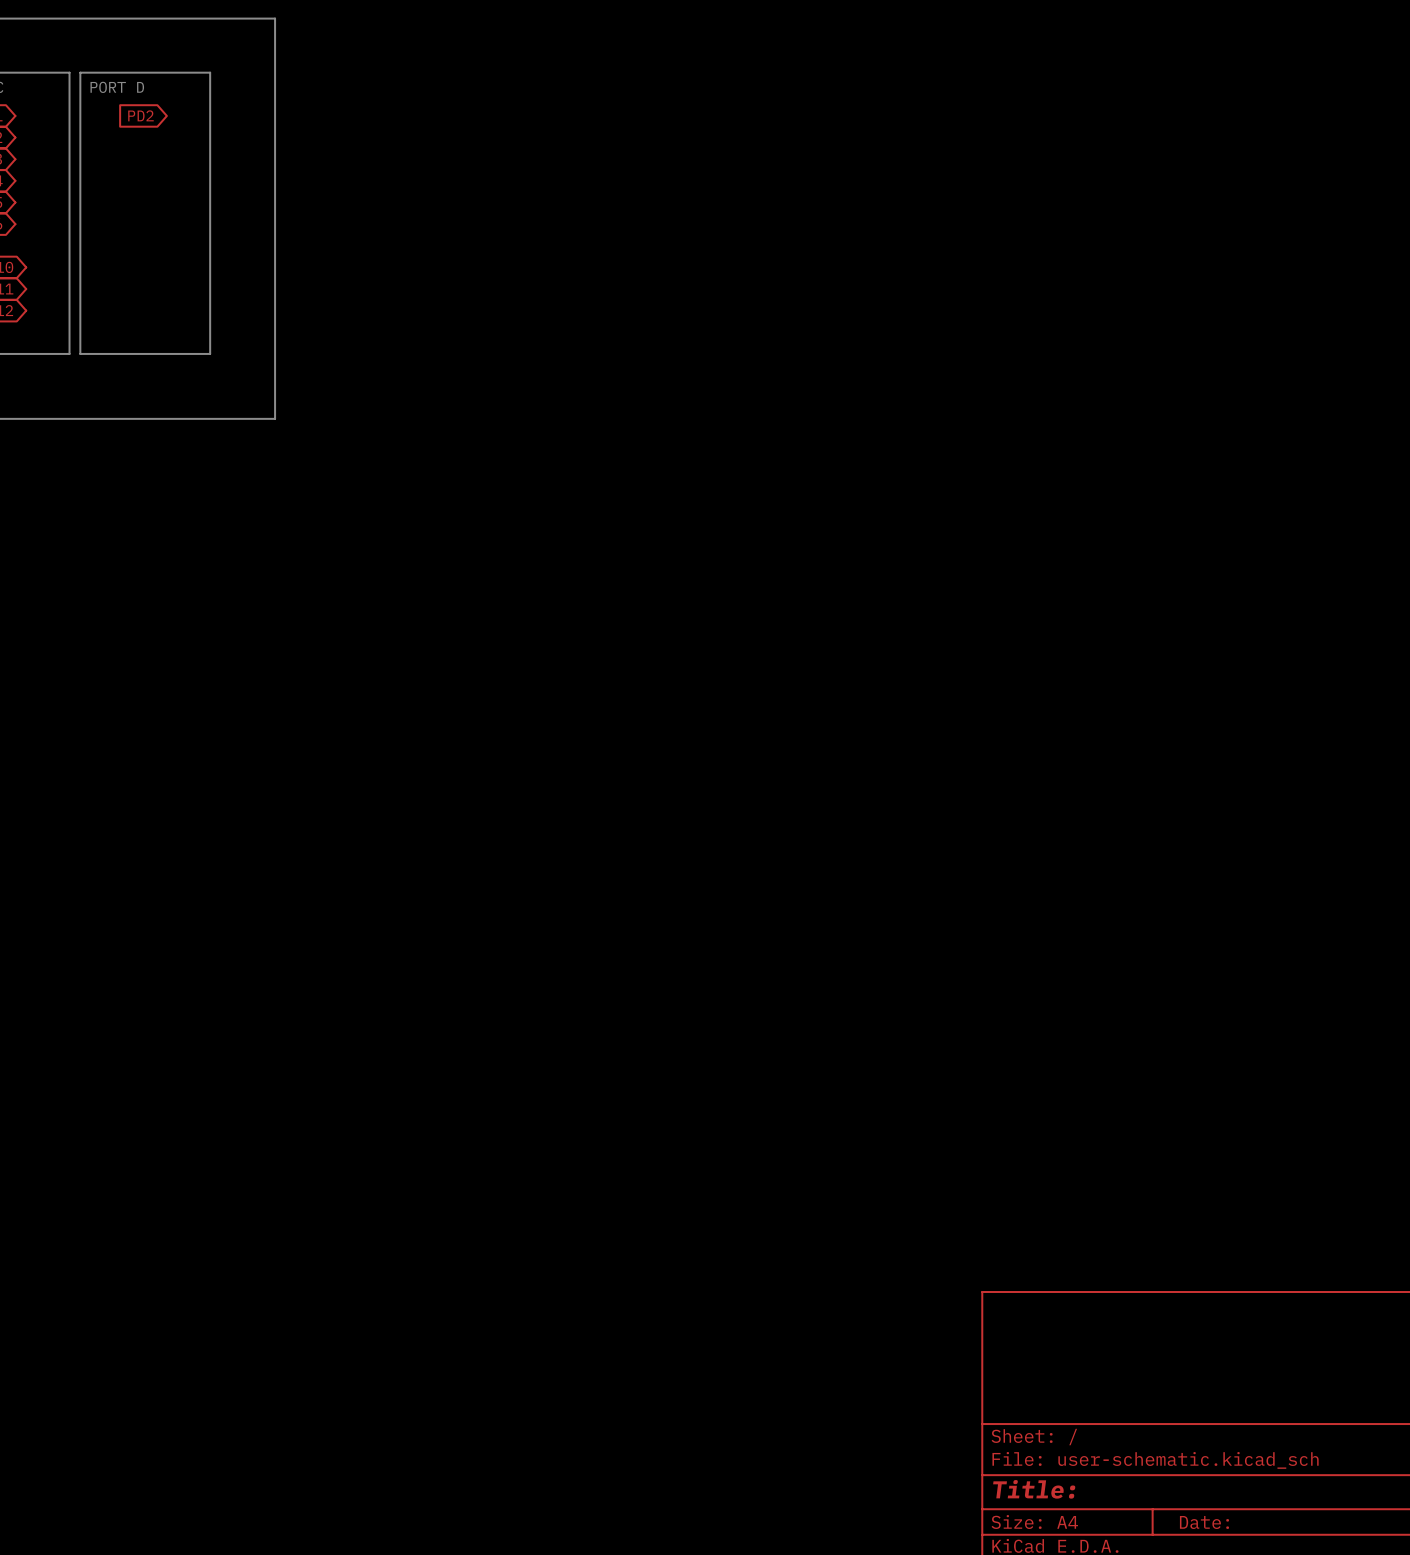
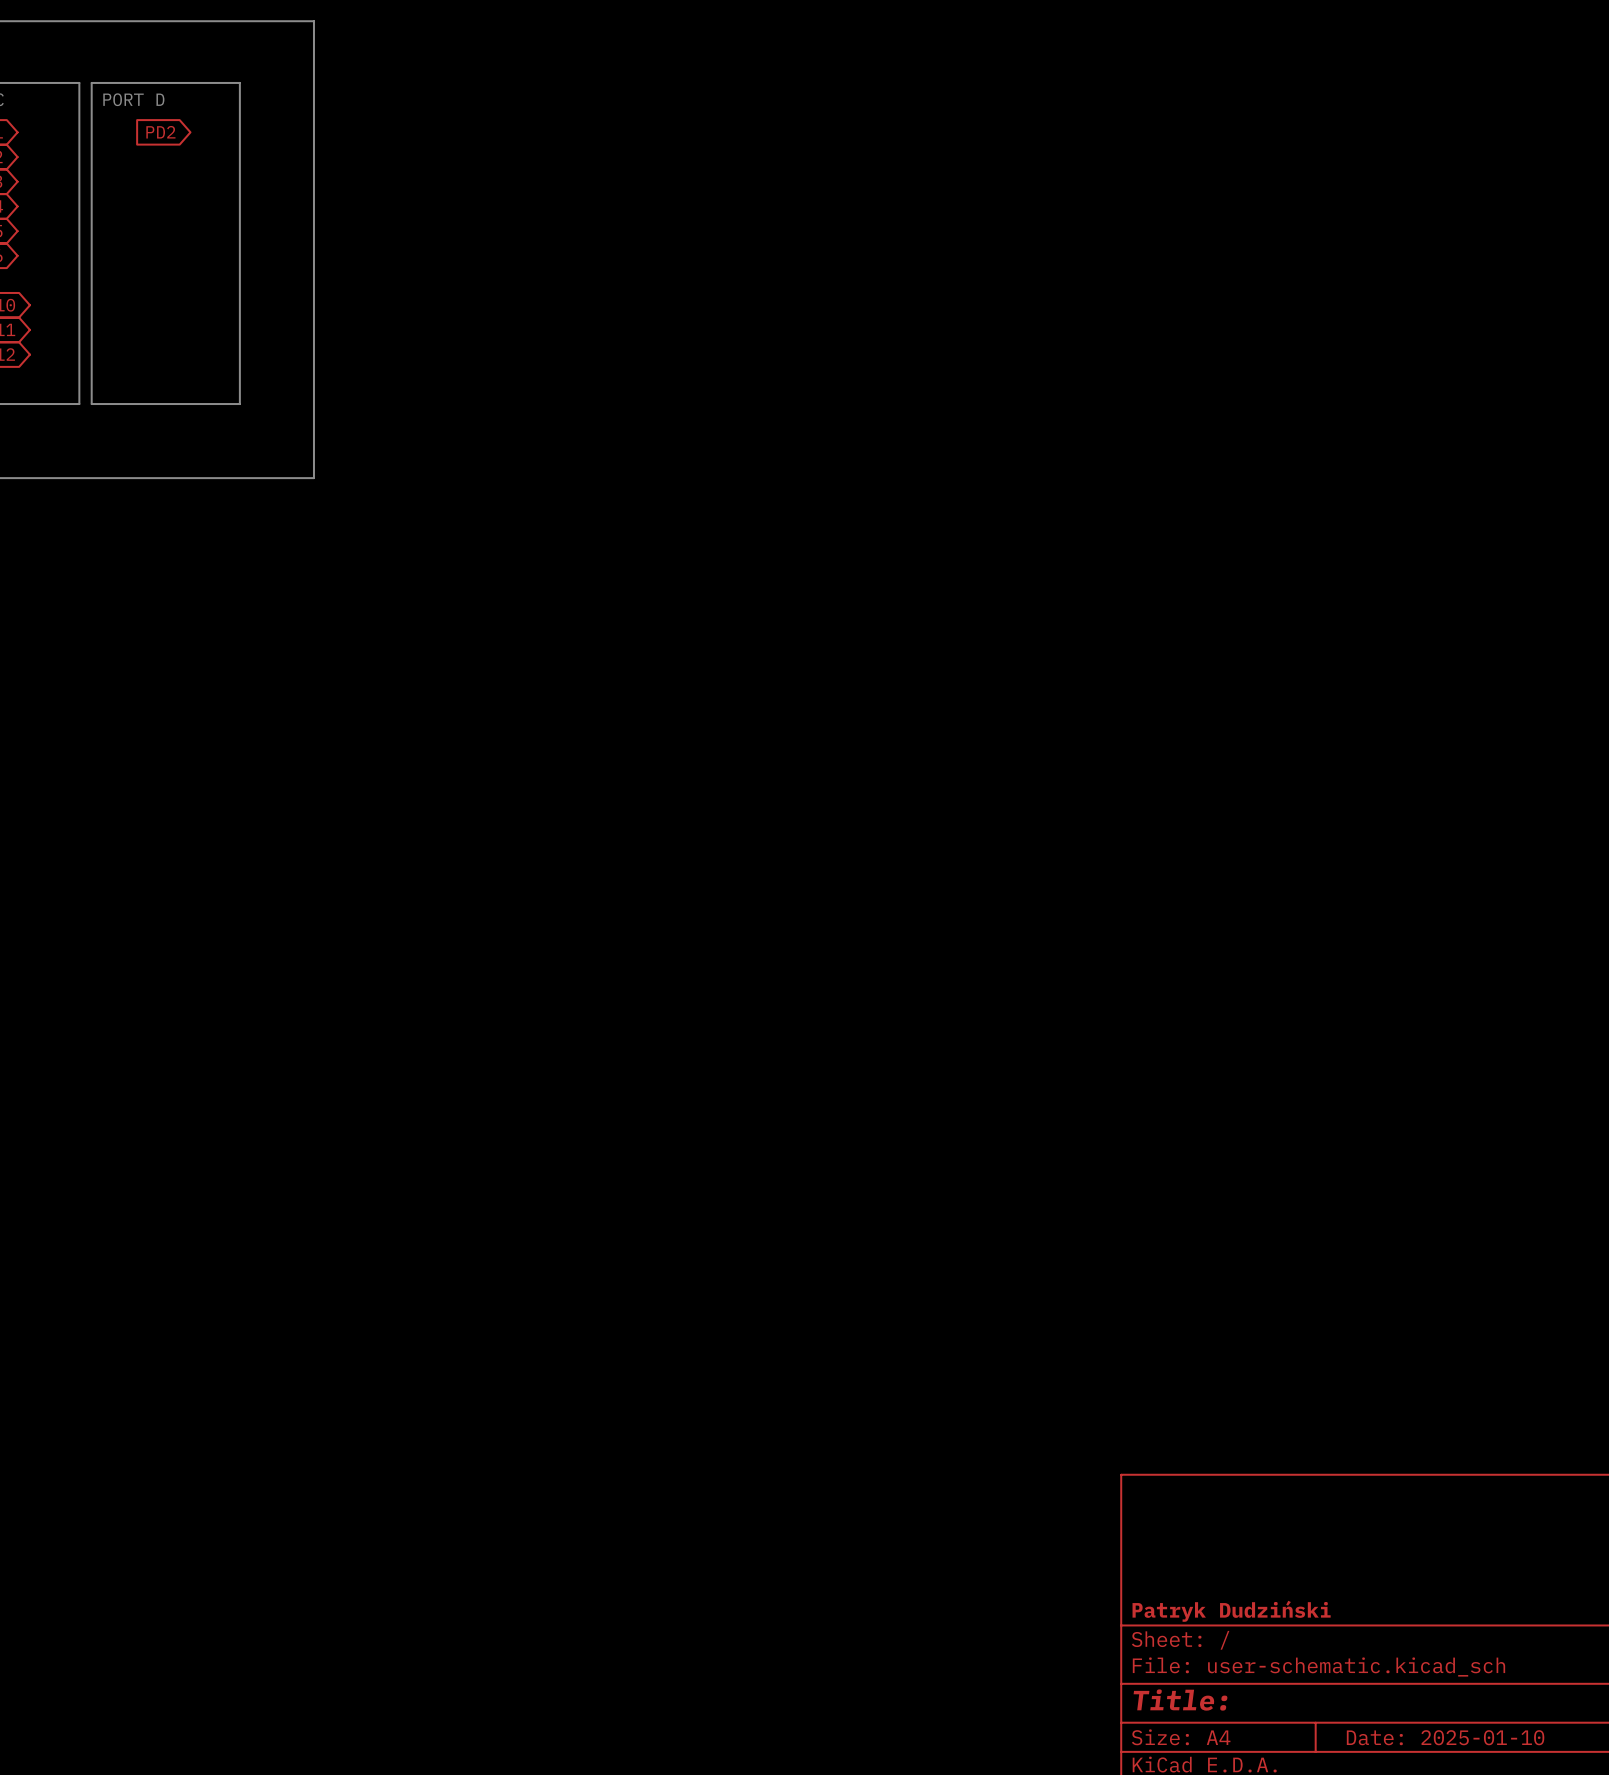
title block: none -> Patryk Dudziński (1231, 1611)
title block: Date: (1204, 1522) -> Date: 2025-01-10 (1445, 1737)

